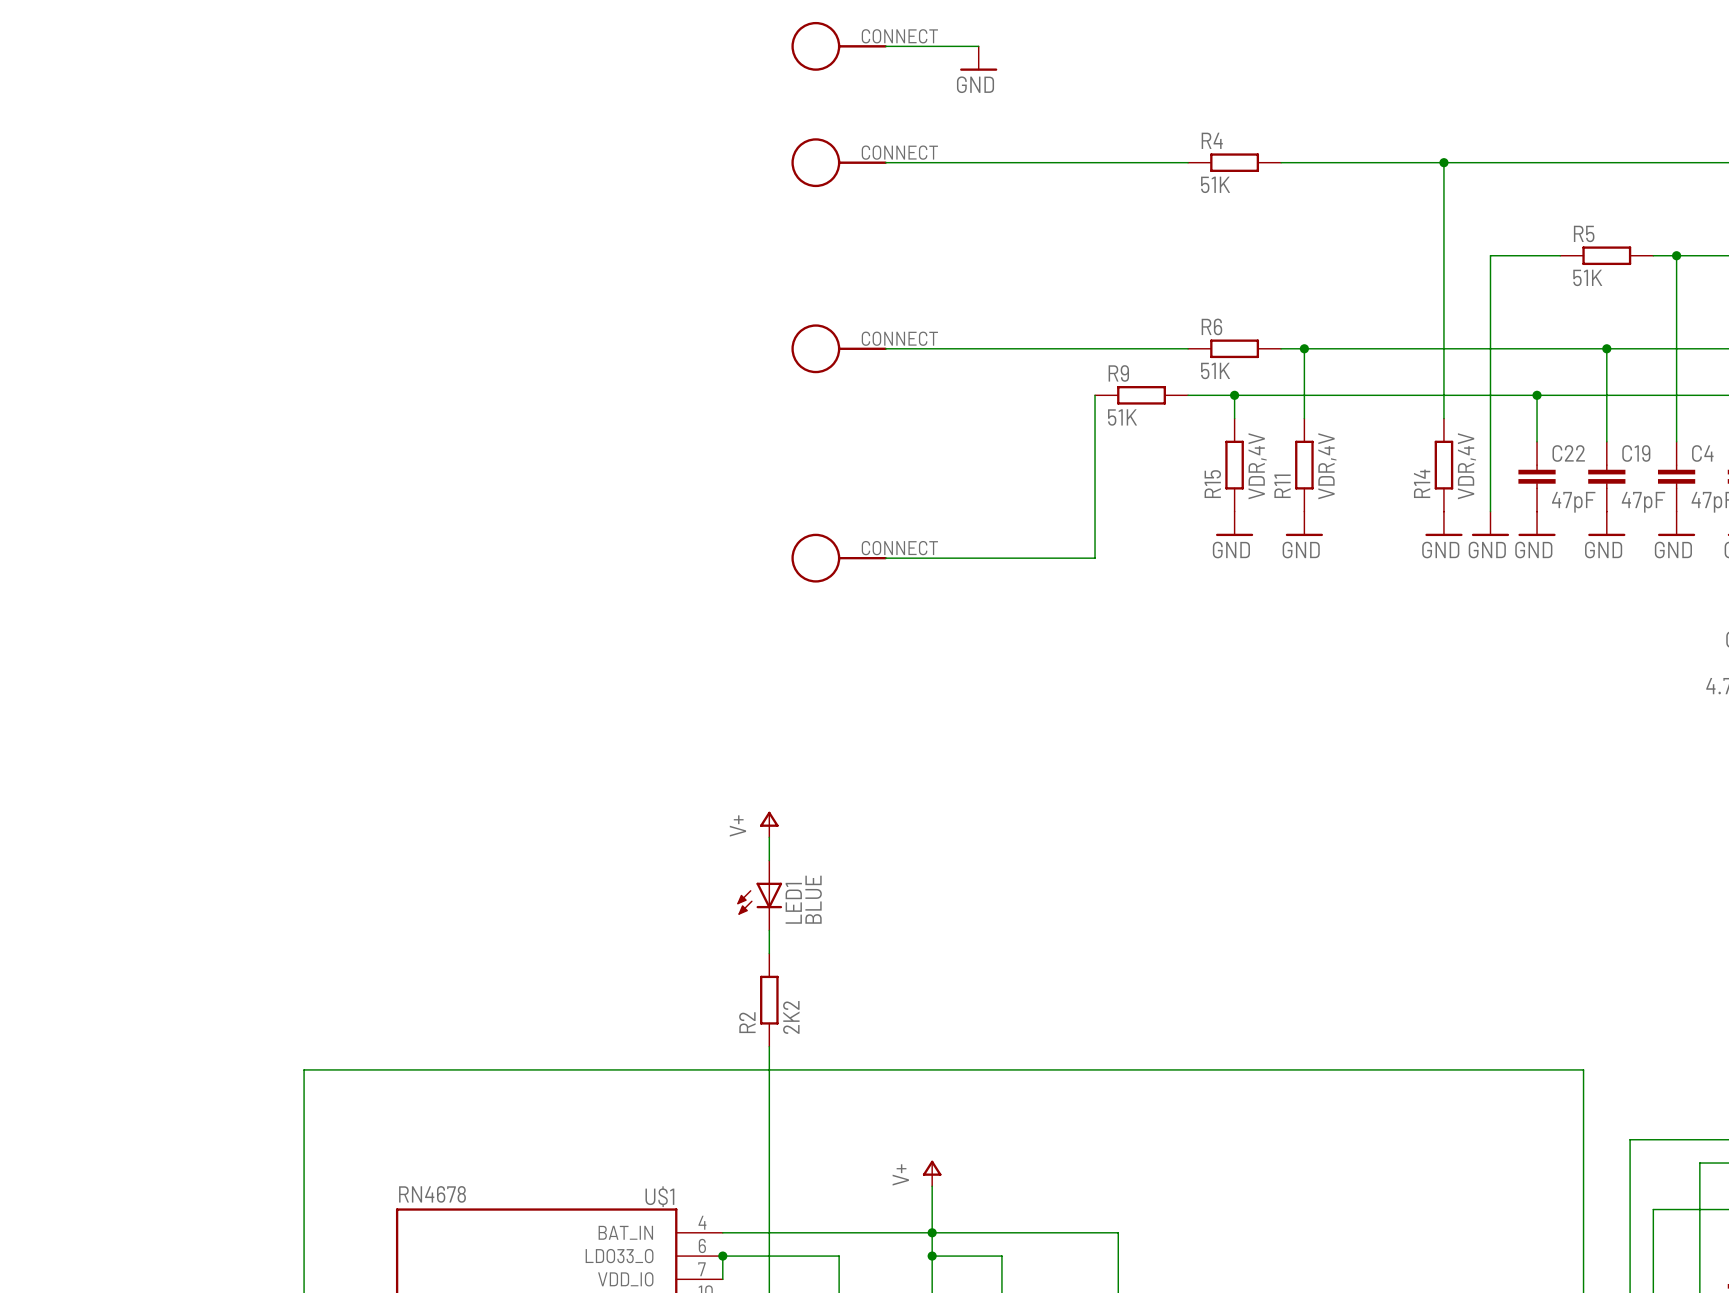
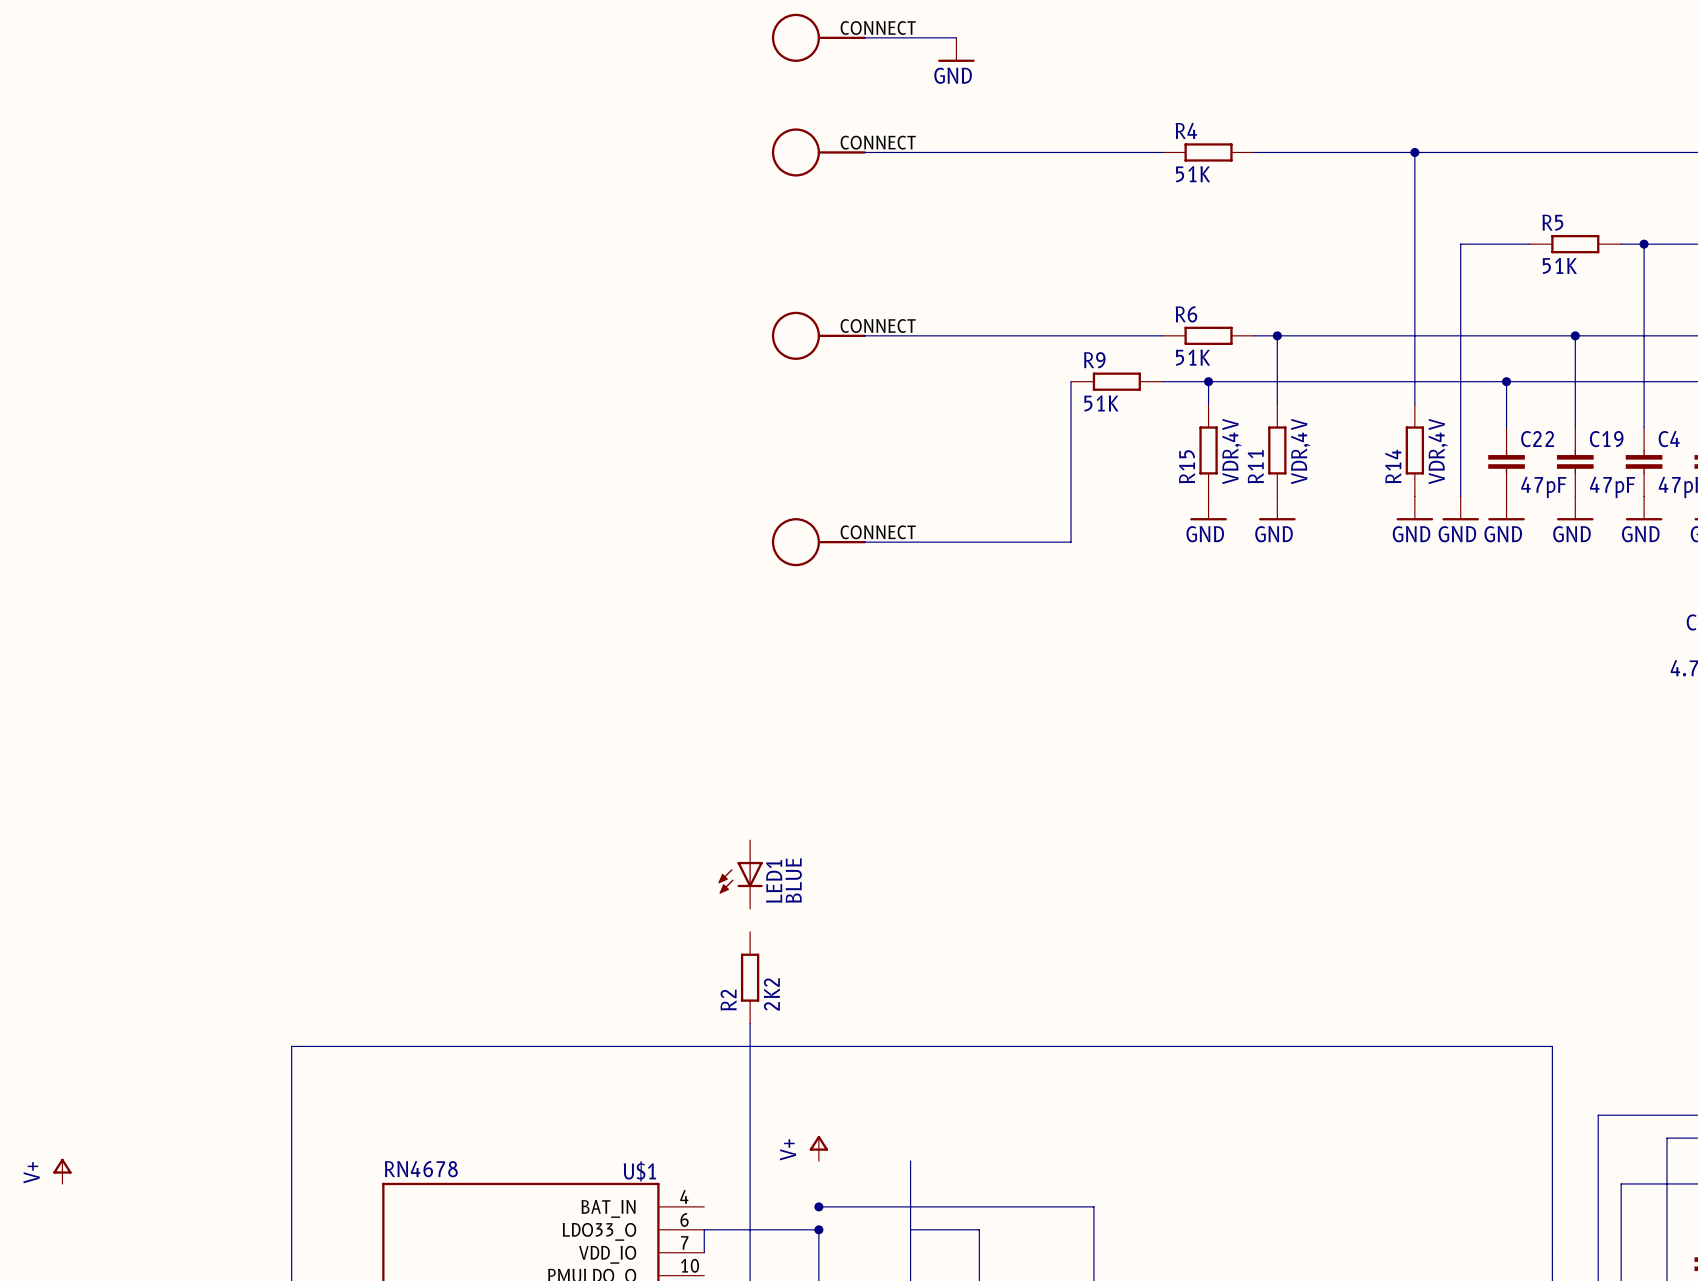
power symbol: V+ (769, 824) -> none
wire: (769, 837) (769, 860) -> none
wire: (769, 930) (769, 953) -> none
power symbol position: V+ (932, 1173) -> V+ (818, 1148)
power symbol: none -> V+ (62, 1171)
wire: (722, 1232) (839, 1232) -> none
junction: none -> (818, 1206)
junction: (932, 1232) -> none
junction: (722, 1256) -> none
junction: none -> (818, 1229)
junction: (932, 1256) -> none

